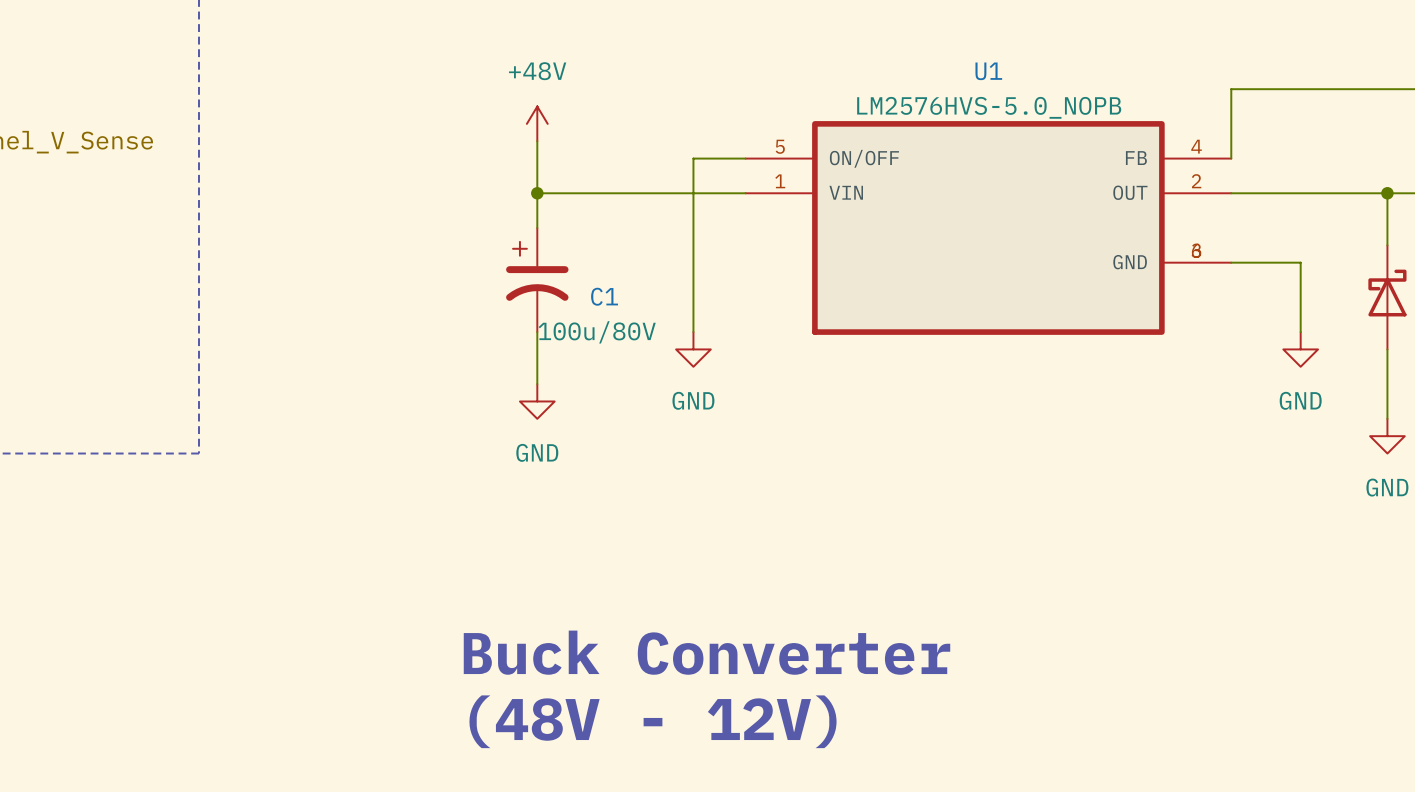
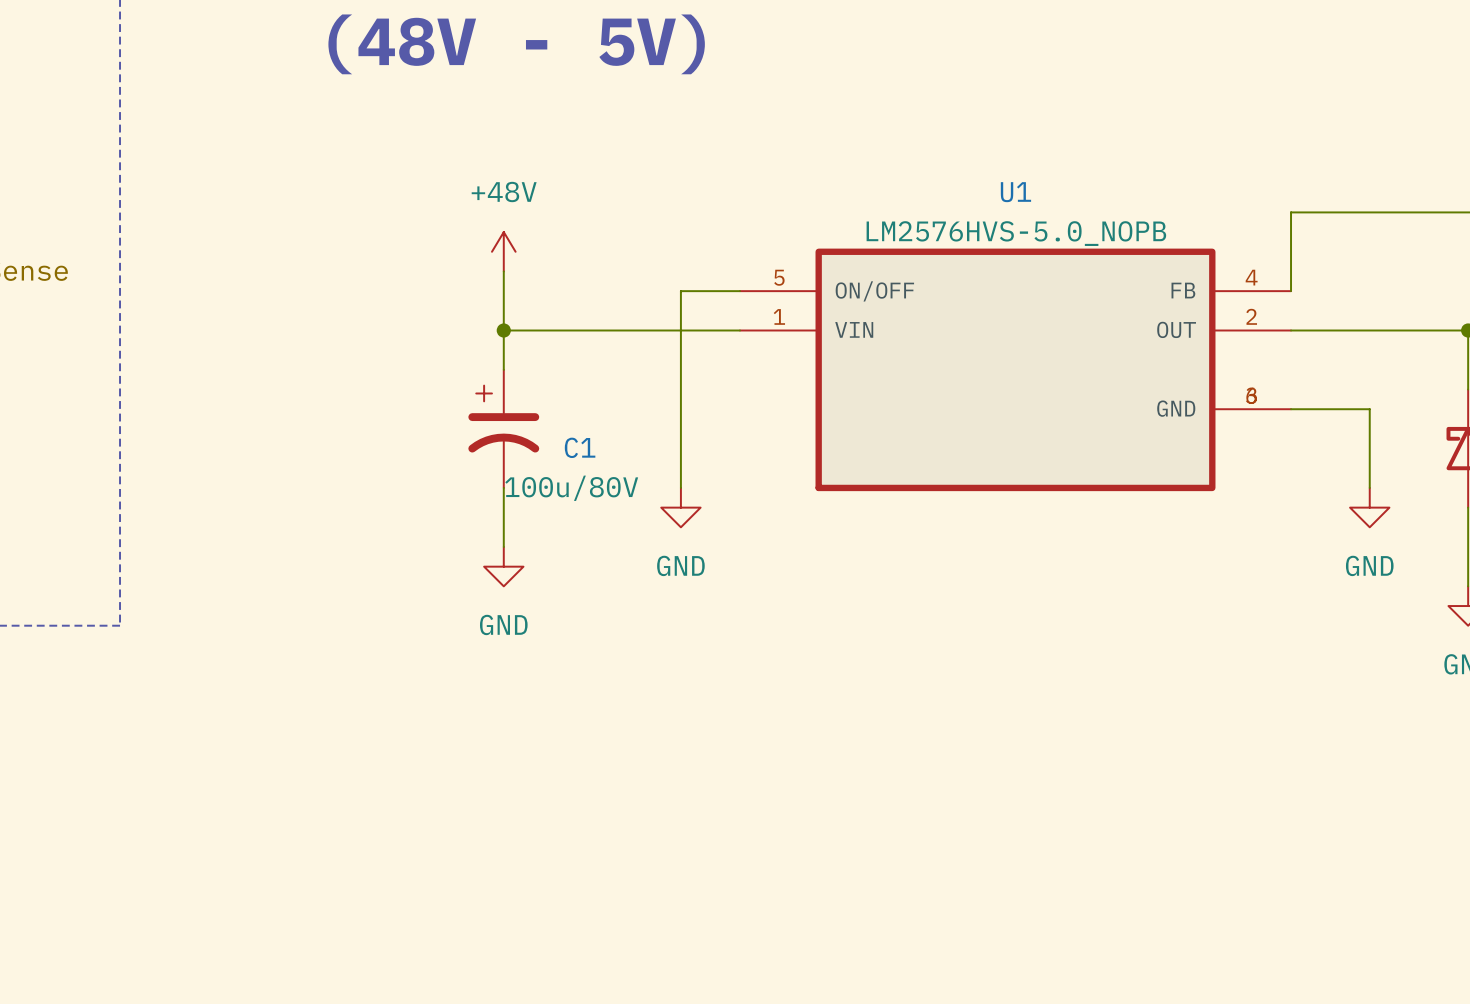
text: Buck Converter (706, 652) -> none
text: (48V - 12V) (653, 721) -> none

